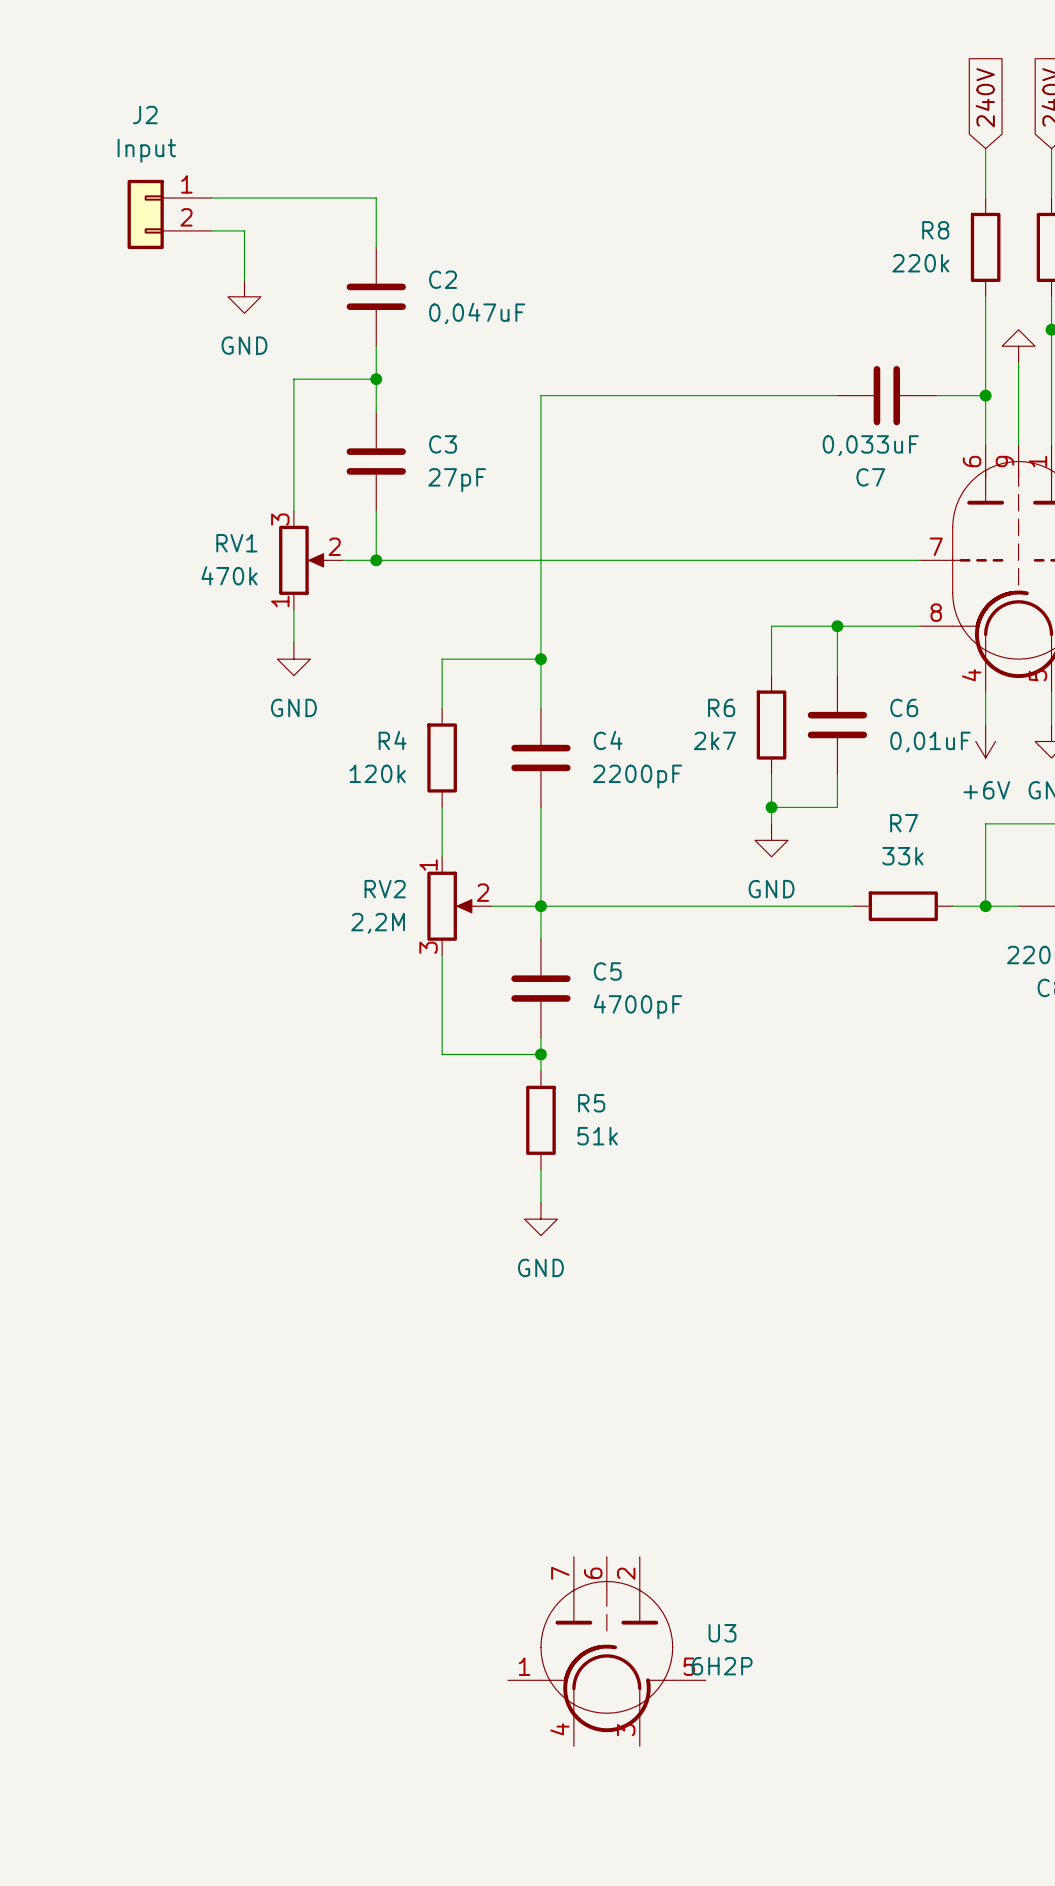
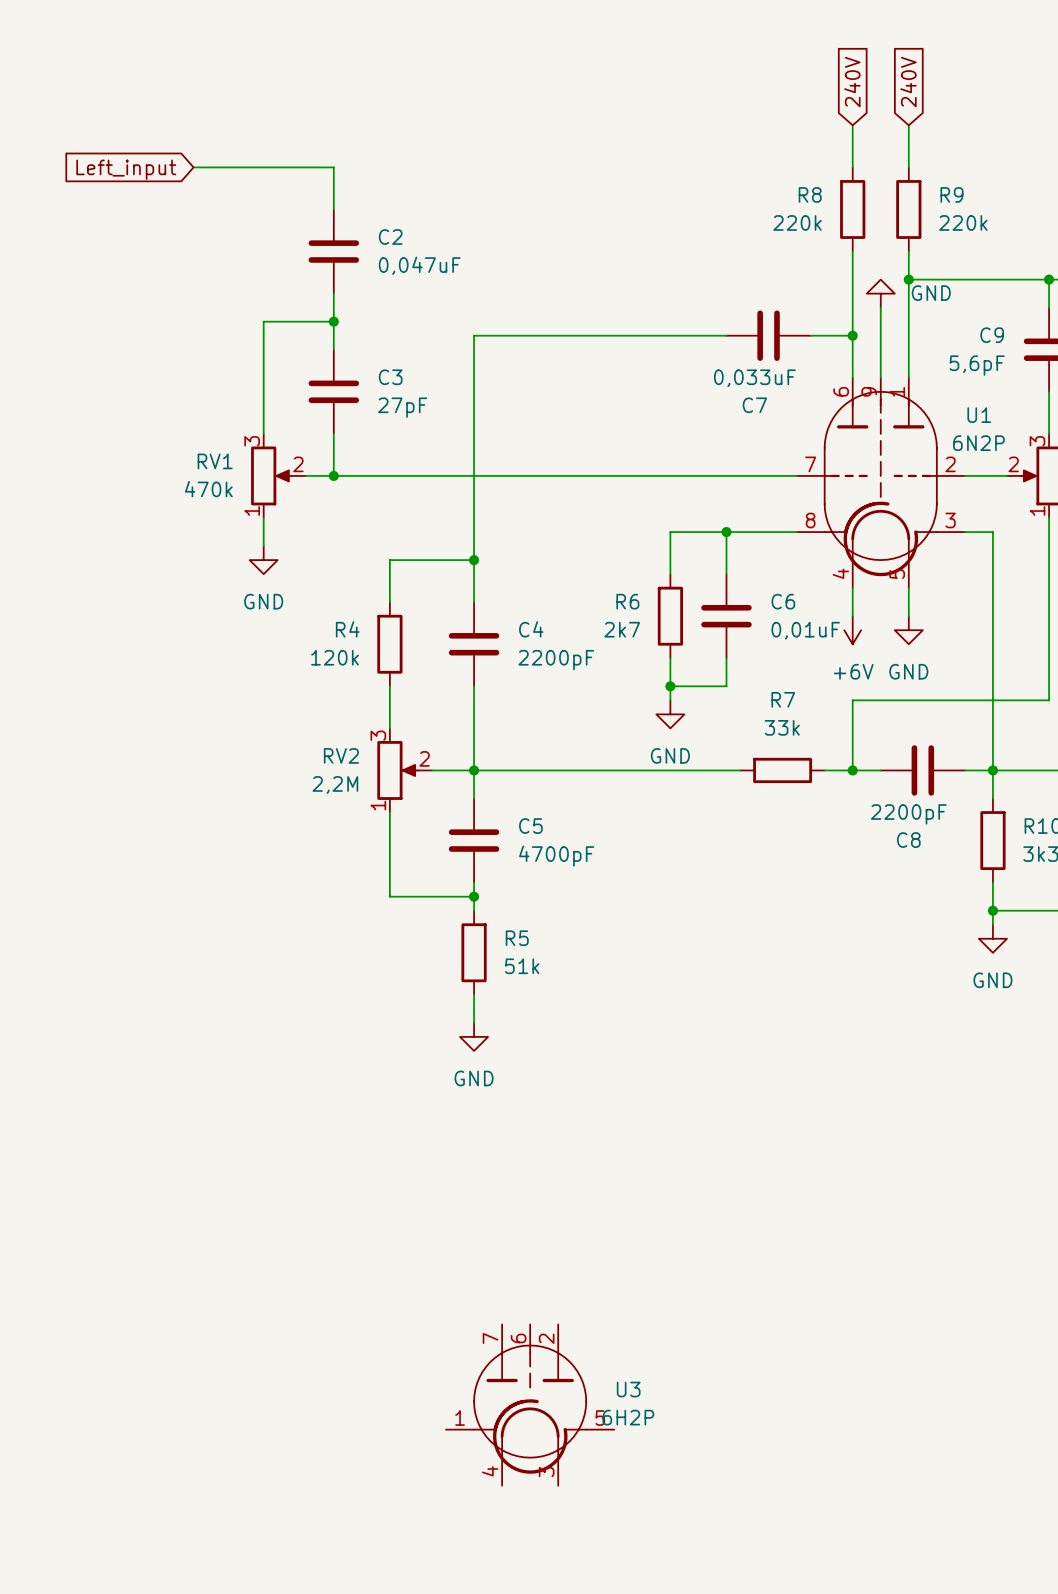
global label: none -> Left_input (126, 169)
J2: Input (169, 214) -> none
wire: (211, 230) (244, 230) (244, 280) -> none
power symbol: GND (244, 296) -> none
RV2 flip: as is (451, 906) -> up-down (397, 770)

